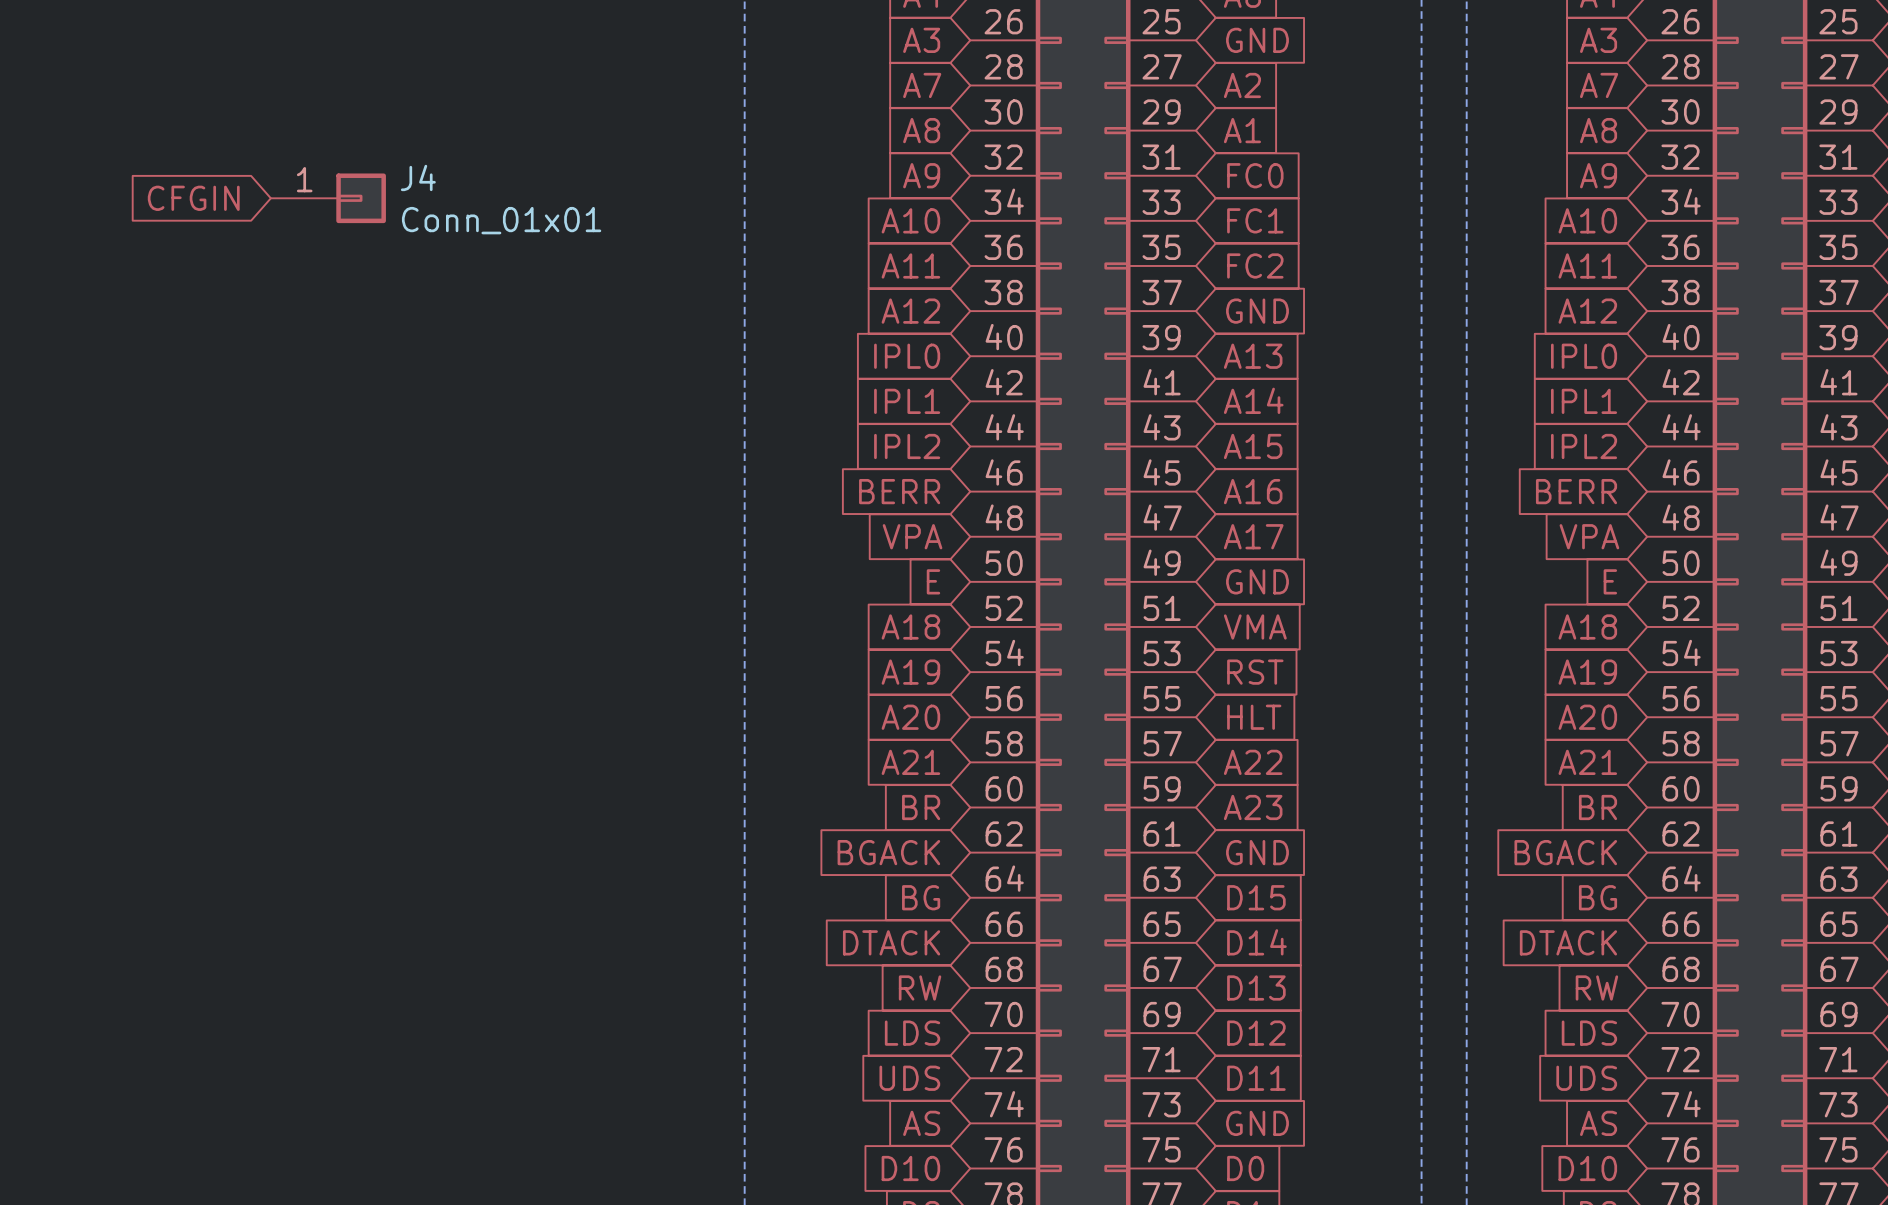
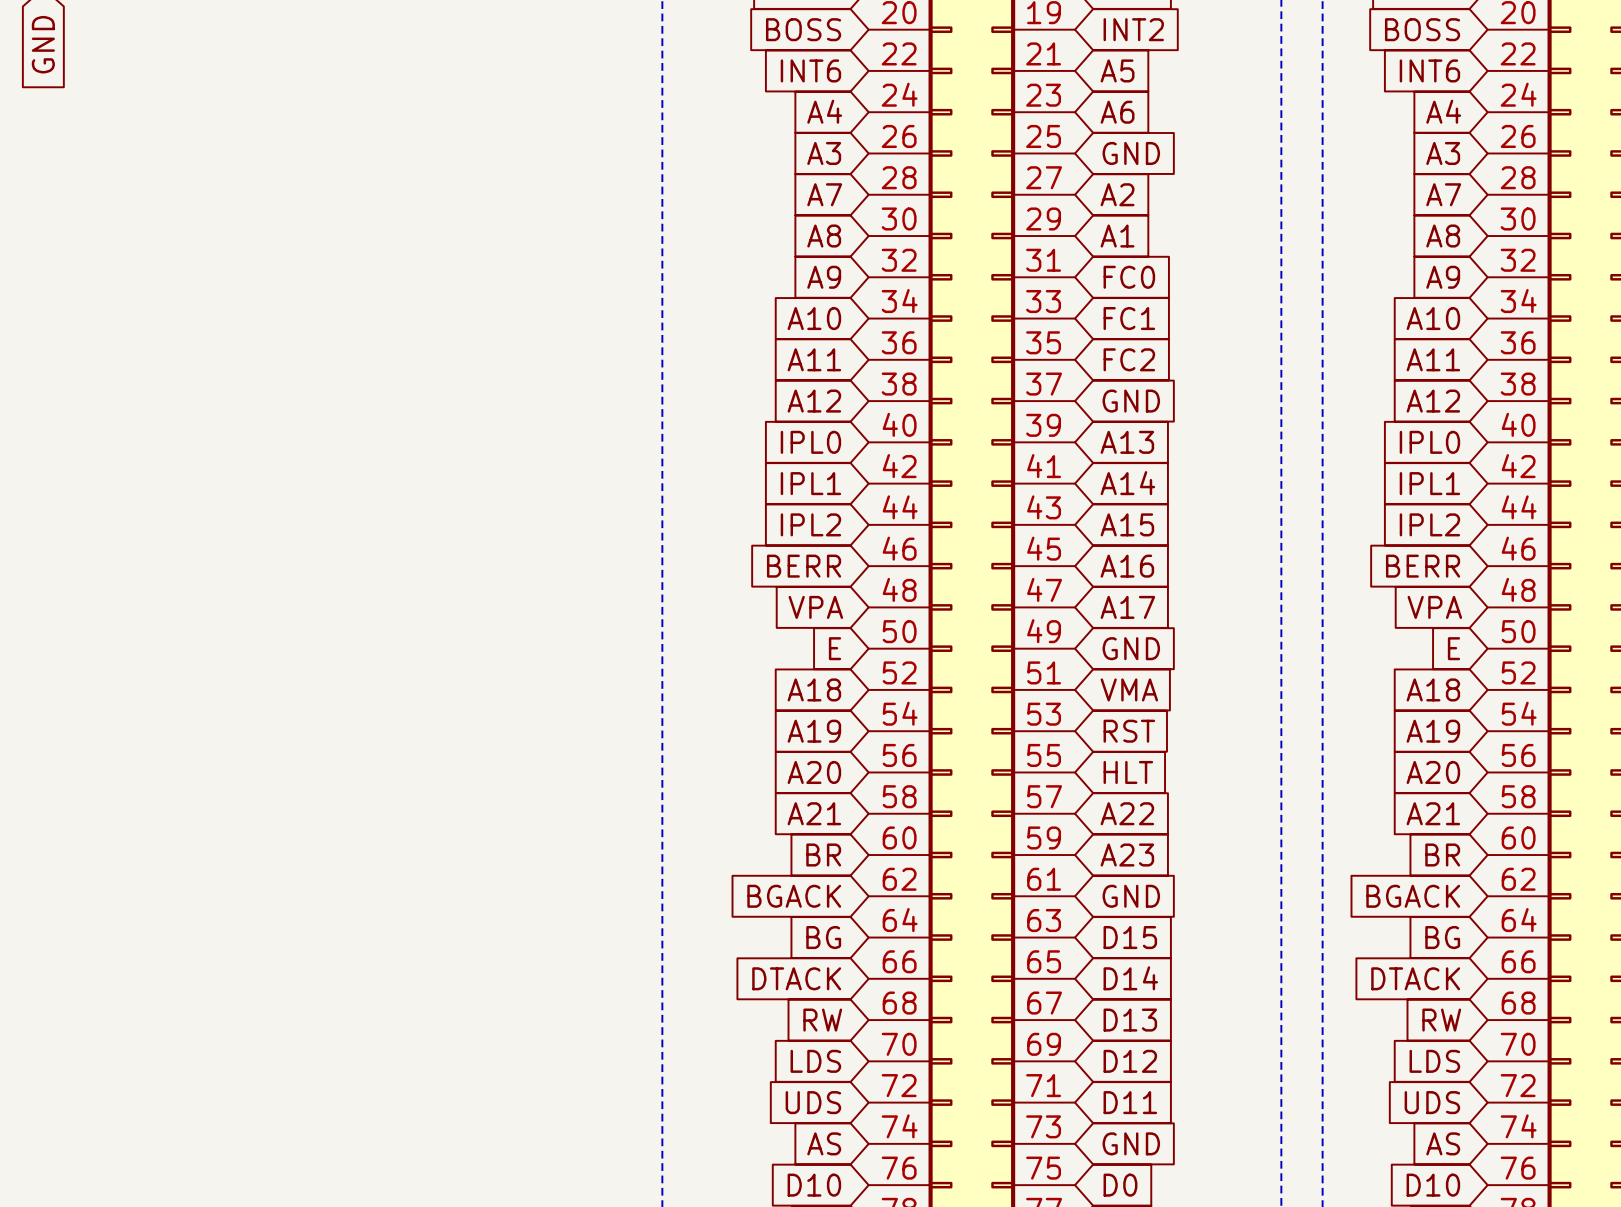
global label: CFGIN (193, 198) -> none
J4: Conn_01x01 (328, 198) -> none

